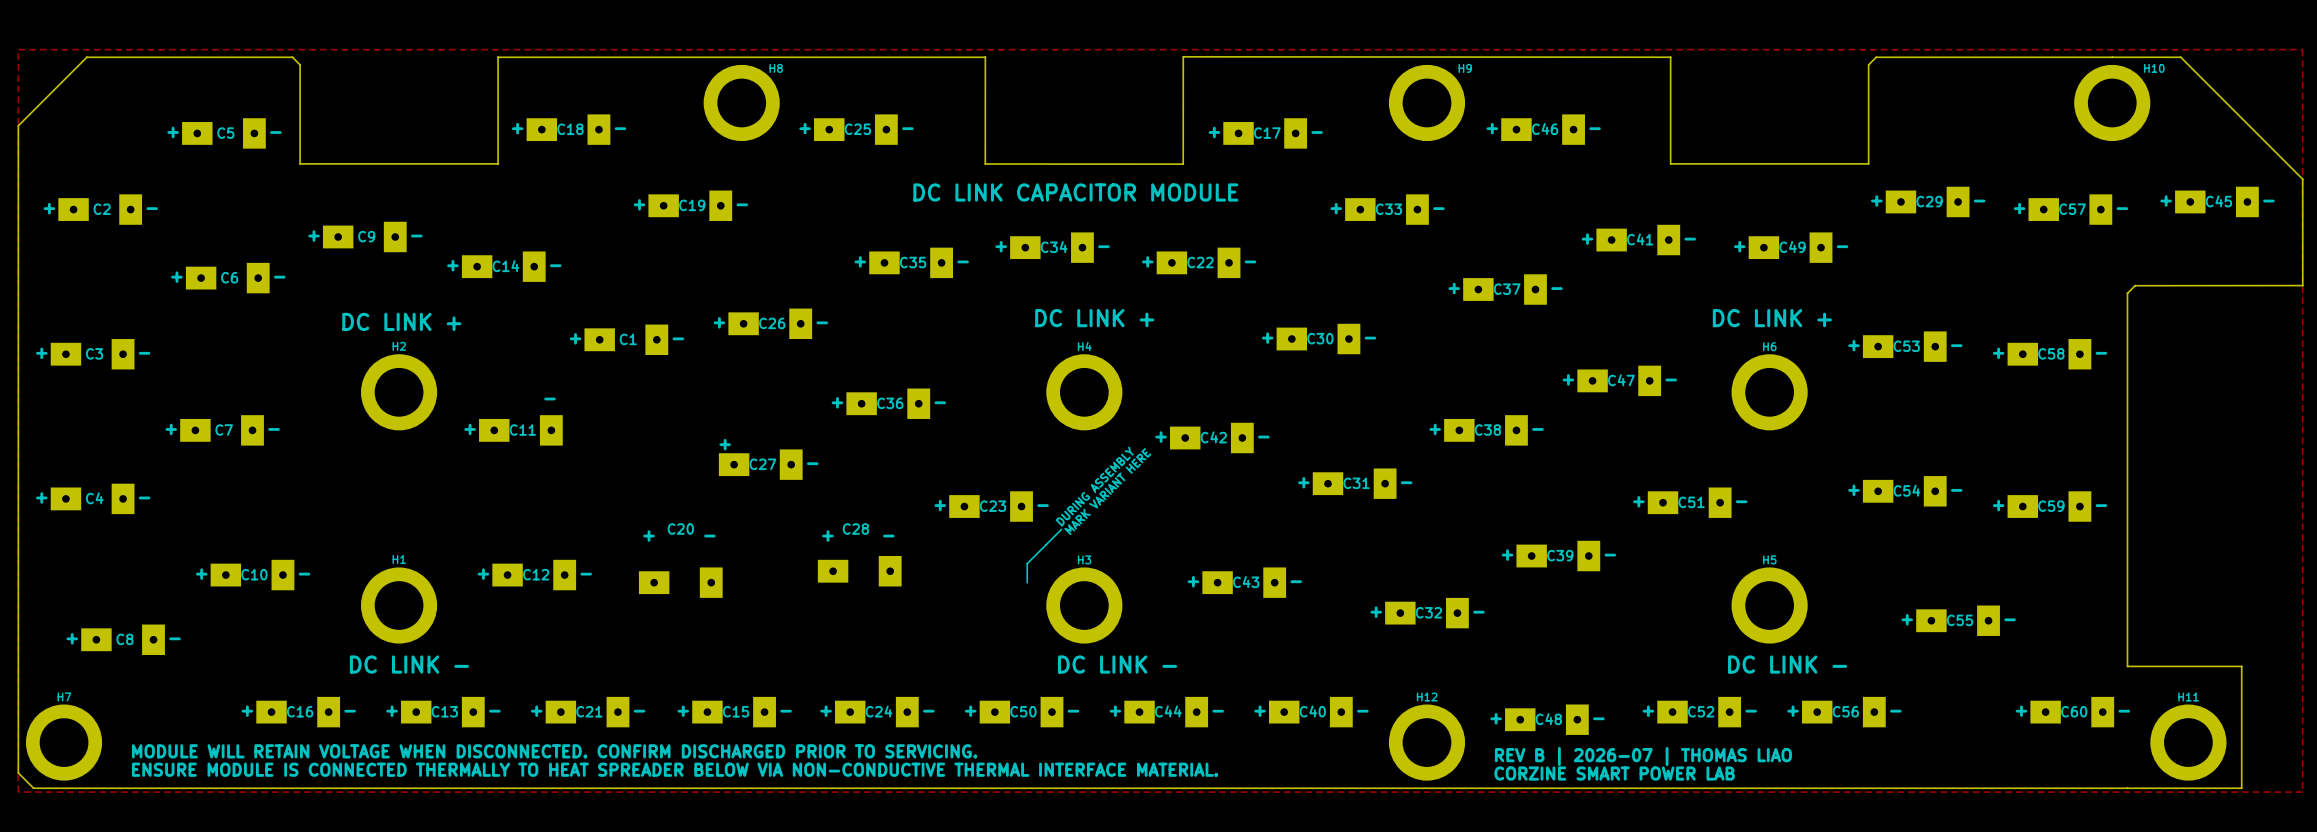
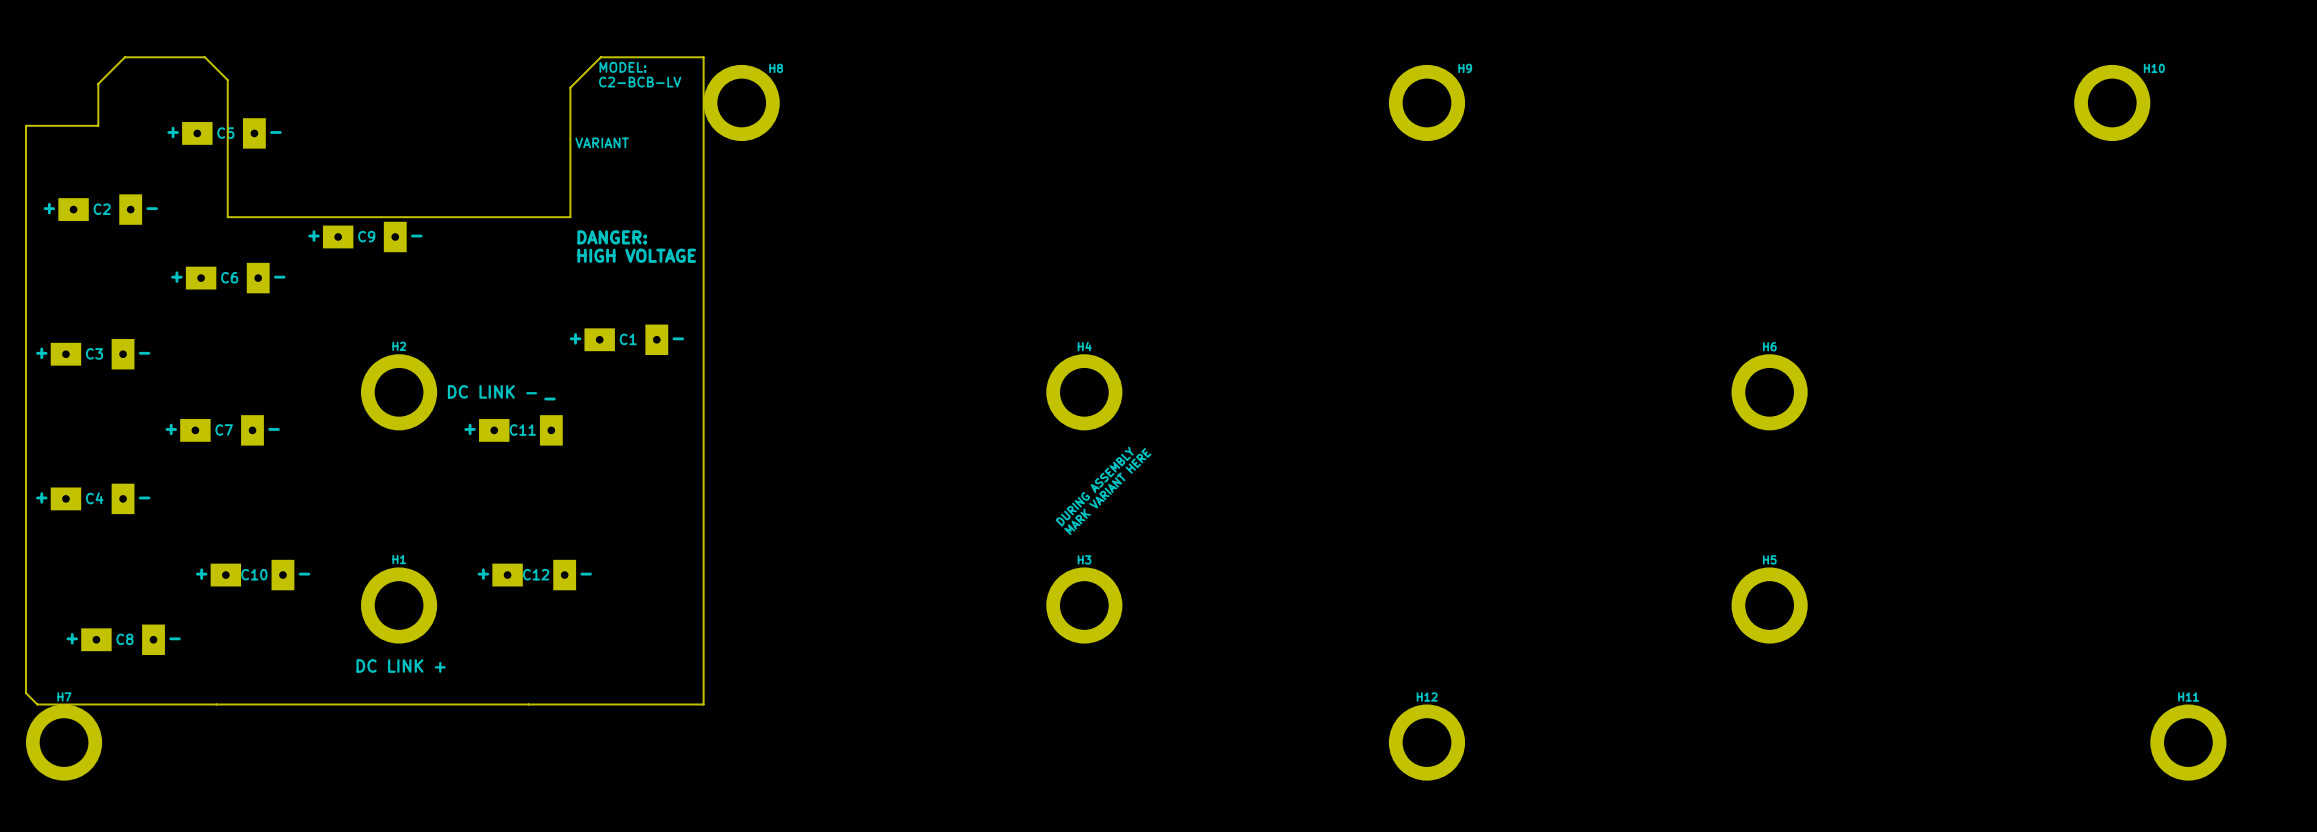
zone outline: (18, 49) (2302, 49) (2302, 792) (18, 792) (18, 49) -> none
board edge: (124, 57) (86, 57) (18, 125) (18, 773) (33, 788) (2241, 788) (2241, 666) (2127, 666) (2127, 293) (2135, 285) (2302, 285) (2302, 179) (2180, 57) (1876, 57) (1868, 64) (1868, 163) (1670, 163) (1670, 57) (1183, 56) (1183, 164) (985, 164) (985, 57) (703, 57) -> (124, 57) (98, 83) (98, 125) (25, 125) (25, 693) (37, 704) (703, 704) (703, 57)
board edge: (204, 57) (292, 57) (300, 64) (300, 163) (498, 163) (498, 57) (600, 57) -> (204, 57) (227, 80) (227, 217) (570, 217) (570, 87) (600, 57)
text: none -> MODEL: (622, 67)
text: none -> C2-BCB-LV (640, 82)
C18: (568, 129) -> none
C25: (855, 129) -> none
C46: (1543, 129) -> none
C17: (1265, 133) -> none
text: none -> VARIANT (602, 142)
text: DC LINK CAPACITOR MODULE (1075, 192) -> none
C29: (1927, 201) -> none
C45: (2216, 201) -> none
C19: (690, 205) -> none
C33: (1387, 209) -> none
C57: (2070, 209) -> none
text: none -> DANGER: (612, 237)
C41: (1638, 240) -> none
C34: (1051, 247) -> none
C49: (1790, 247) -> none
text: none -> HIGH VOLTAGE (636, 255)
C35: (911, 262) -> none
C22: (1198, 262) -> none
C14: (503, 266) -> none
C37: (1505, 289) -> none
text: DC LINK + (1094, 318) -> none
text: DC LINK + (1772, 318) -> none
text: DC LINK + (401, 321) -> none
C26: (770, 323) -> none
C30: (1318, 339) -> none
C53: (1904, 346) -> none
C58: (2049, 354) -> none
C47: (1619, 380) -> none
text: none -> DC LINK - (492, 391)
C36: (888, 403) -> none
C38: (1485, 430) -> none
C42: (1211, 437) -> none
C27: (760, 464) -> none
C31: (1354, 483) -> none
C54: (1904, 491) -> none
C51: (1689, 502) -> none
C23: (991, 506) -> none
C59: (2049, 506) -> none
line: (1061, 529) (1027, 563) (1027, 582) -> none
C39: (1558, 556) -> none
C28: (859, 571) -> none
C20: (680, 582) -> none
C43: (1244, 582) -> none
C32: (1426, 613) -> none
C55: (1958, 620) -> none
text: DC LINK - (409, 664) -> DC LINK + (401, 665)
text: DC LINK - (1117, 664) -> none
text: DC LINK - (1787, 664) -> none
C16: (298, 712) -> none
C13: (442, 712) -> none
C21: (587, 712) -> none
C15: (734, 712) -> none
C24: (876, 712) -> none
C50: (1021, 712) -> none
C44: (1166, 712) -> none
C40: (1310, 712) -> none
C52: (1699, 712) -> none
C56: (1843, 712) -> none
C60: (2072, 712) -> none
C48: (1546, 719) -> none
text: MODULE WILL RETAIN VOLTAGE WHEN DISCONNECTED. CONFIRM DISCHARGED PRIOR TO SERVICING. (554, 751) -> none
text: REV B | 2026-07 | THOMAS LIAO (1643, 756) -> none
text: ENSURE MODULE IS CONNECTED THERMALLY TO HEAT SPREADER BELOW VIA NON-CONDUCTIVE THERMAL INTERFACE MATERIAL. (675, 769) -> none
text: CORZINE SMART POWER LAB (1614, 773) -> none

